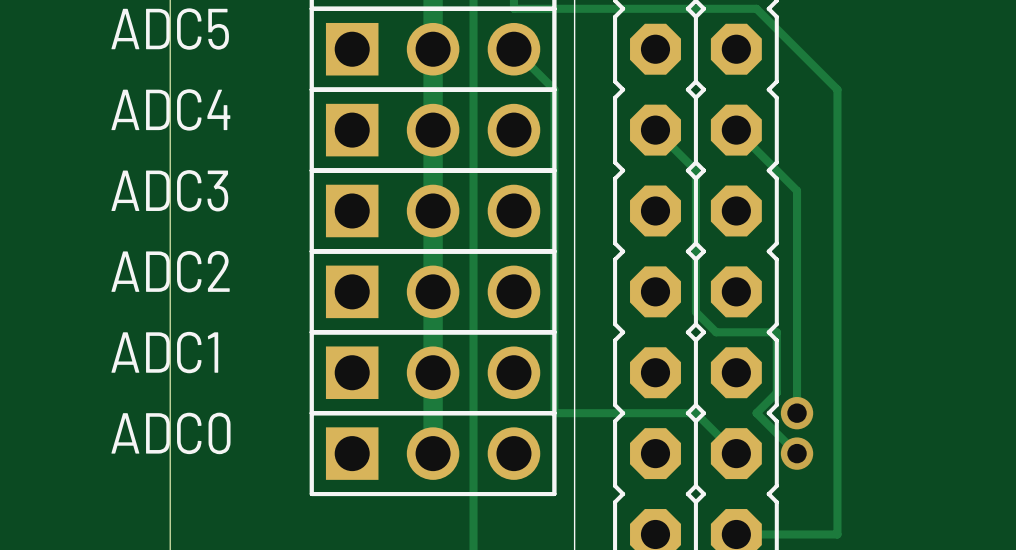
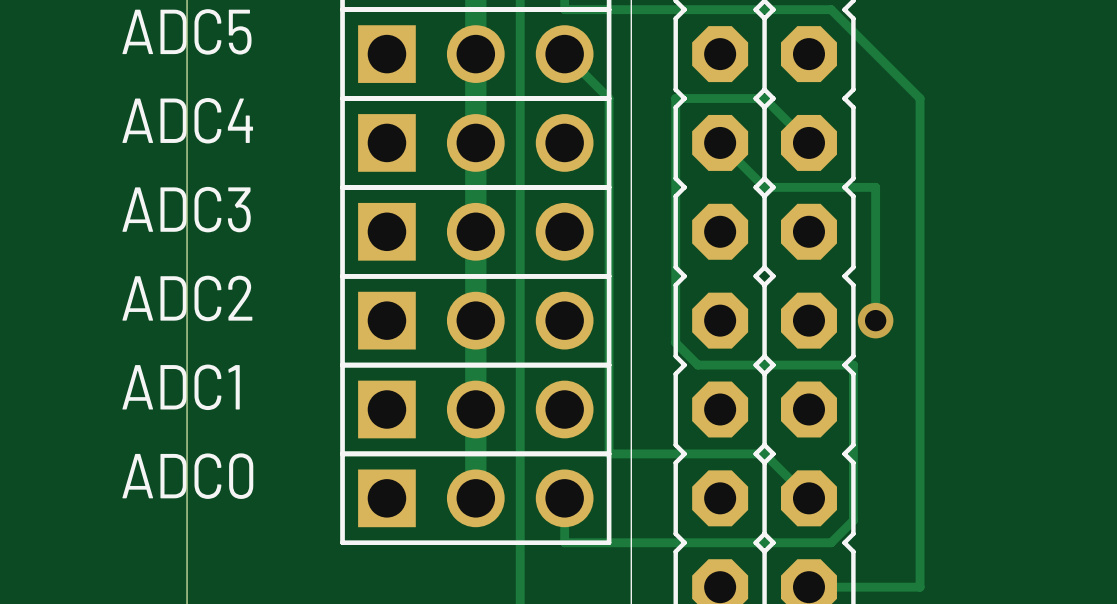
track: (736, 130) (797, 190) -> (764, 187) (875, 187) (875, 209)
track: (695, 170) (695, 312) (716, 332) -> (808, 142) (764, 98) (675, 98) (675, 342) (697, 365) (786, 365)
track: (797, 291) (797, 413) -> none
via: none -> (875, 320)
track: (776, 392) (756, 413) (797, 453) -> (853, 431) (853, 520) (831, 542) (564, 542) (564, 498)
via: (797, 413) -> none
via: (797, 453) -> none

